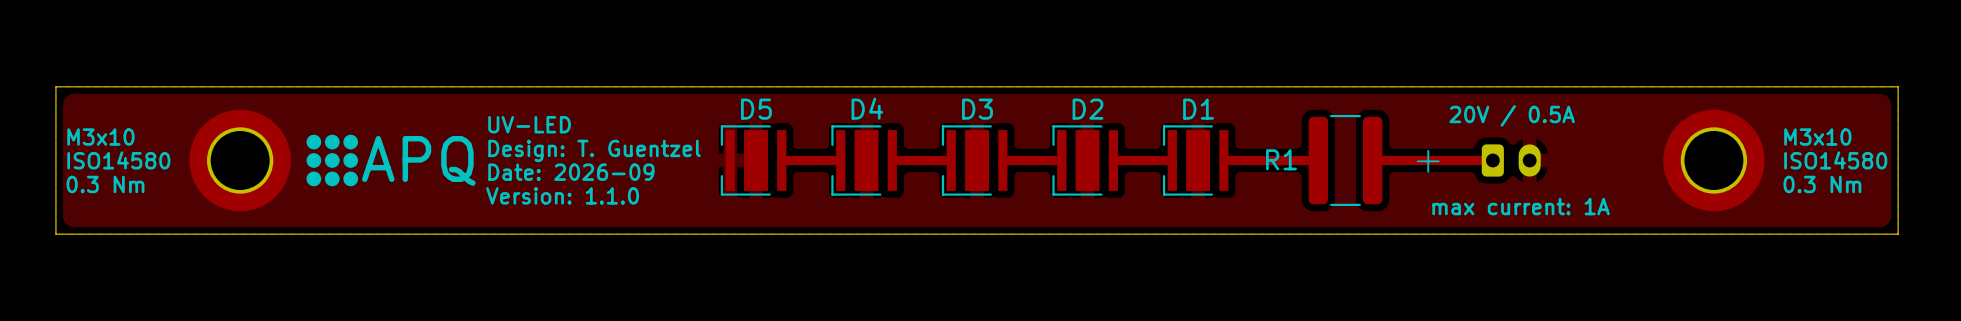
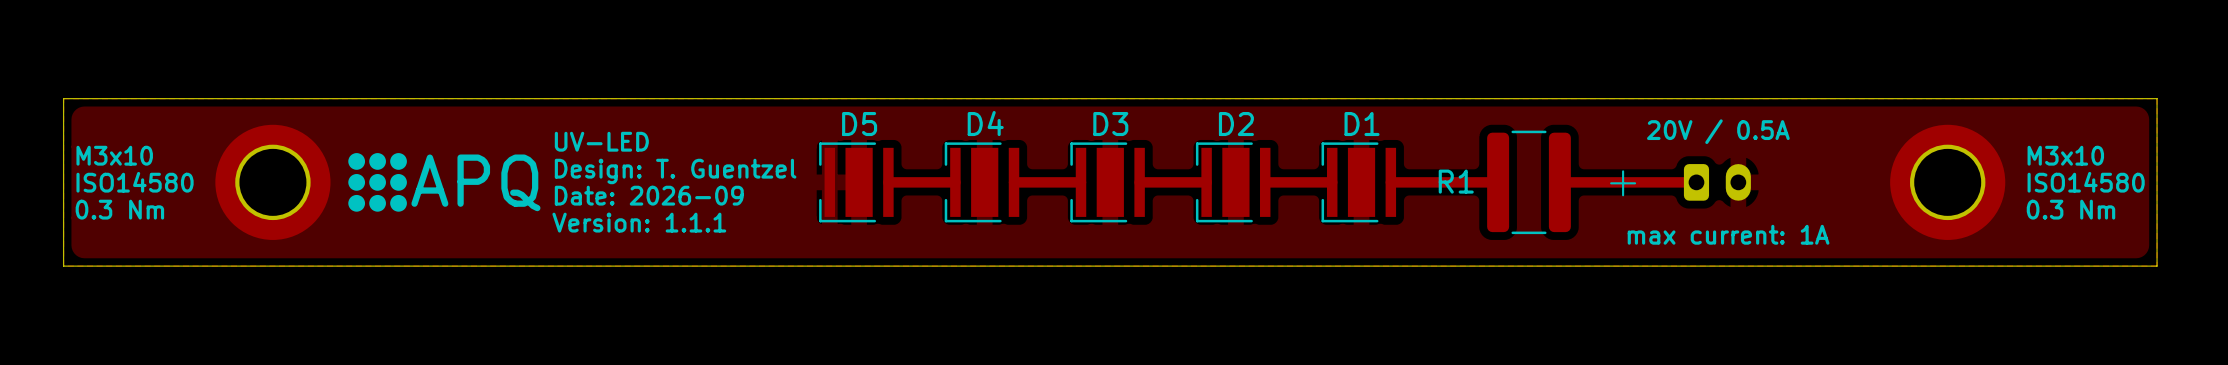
text: Version: 1.1.0 (562, 195) -> Version: 1.1.1 (639, 222)

